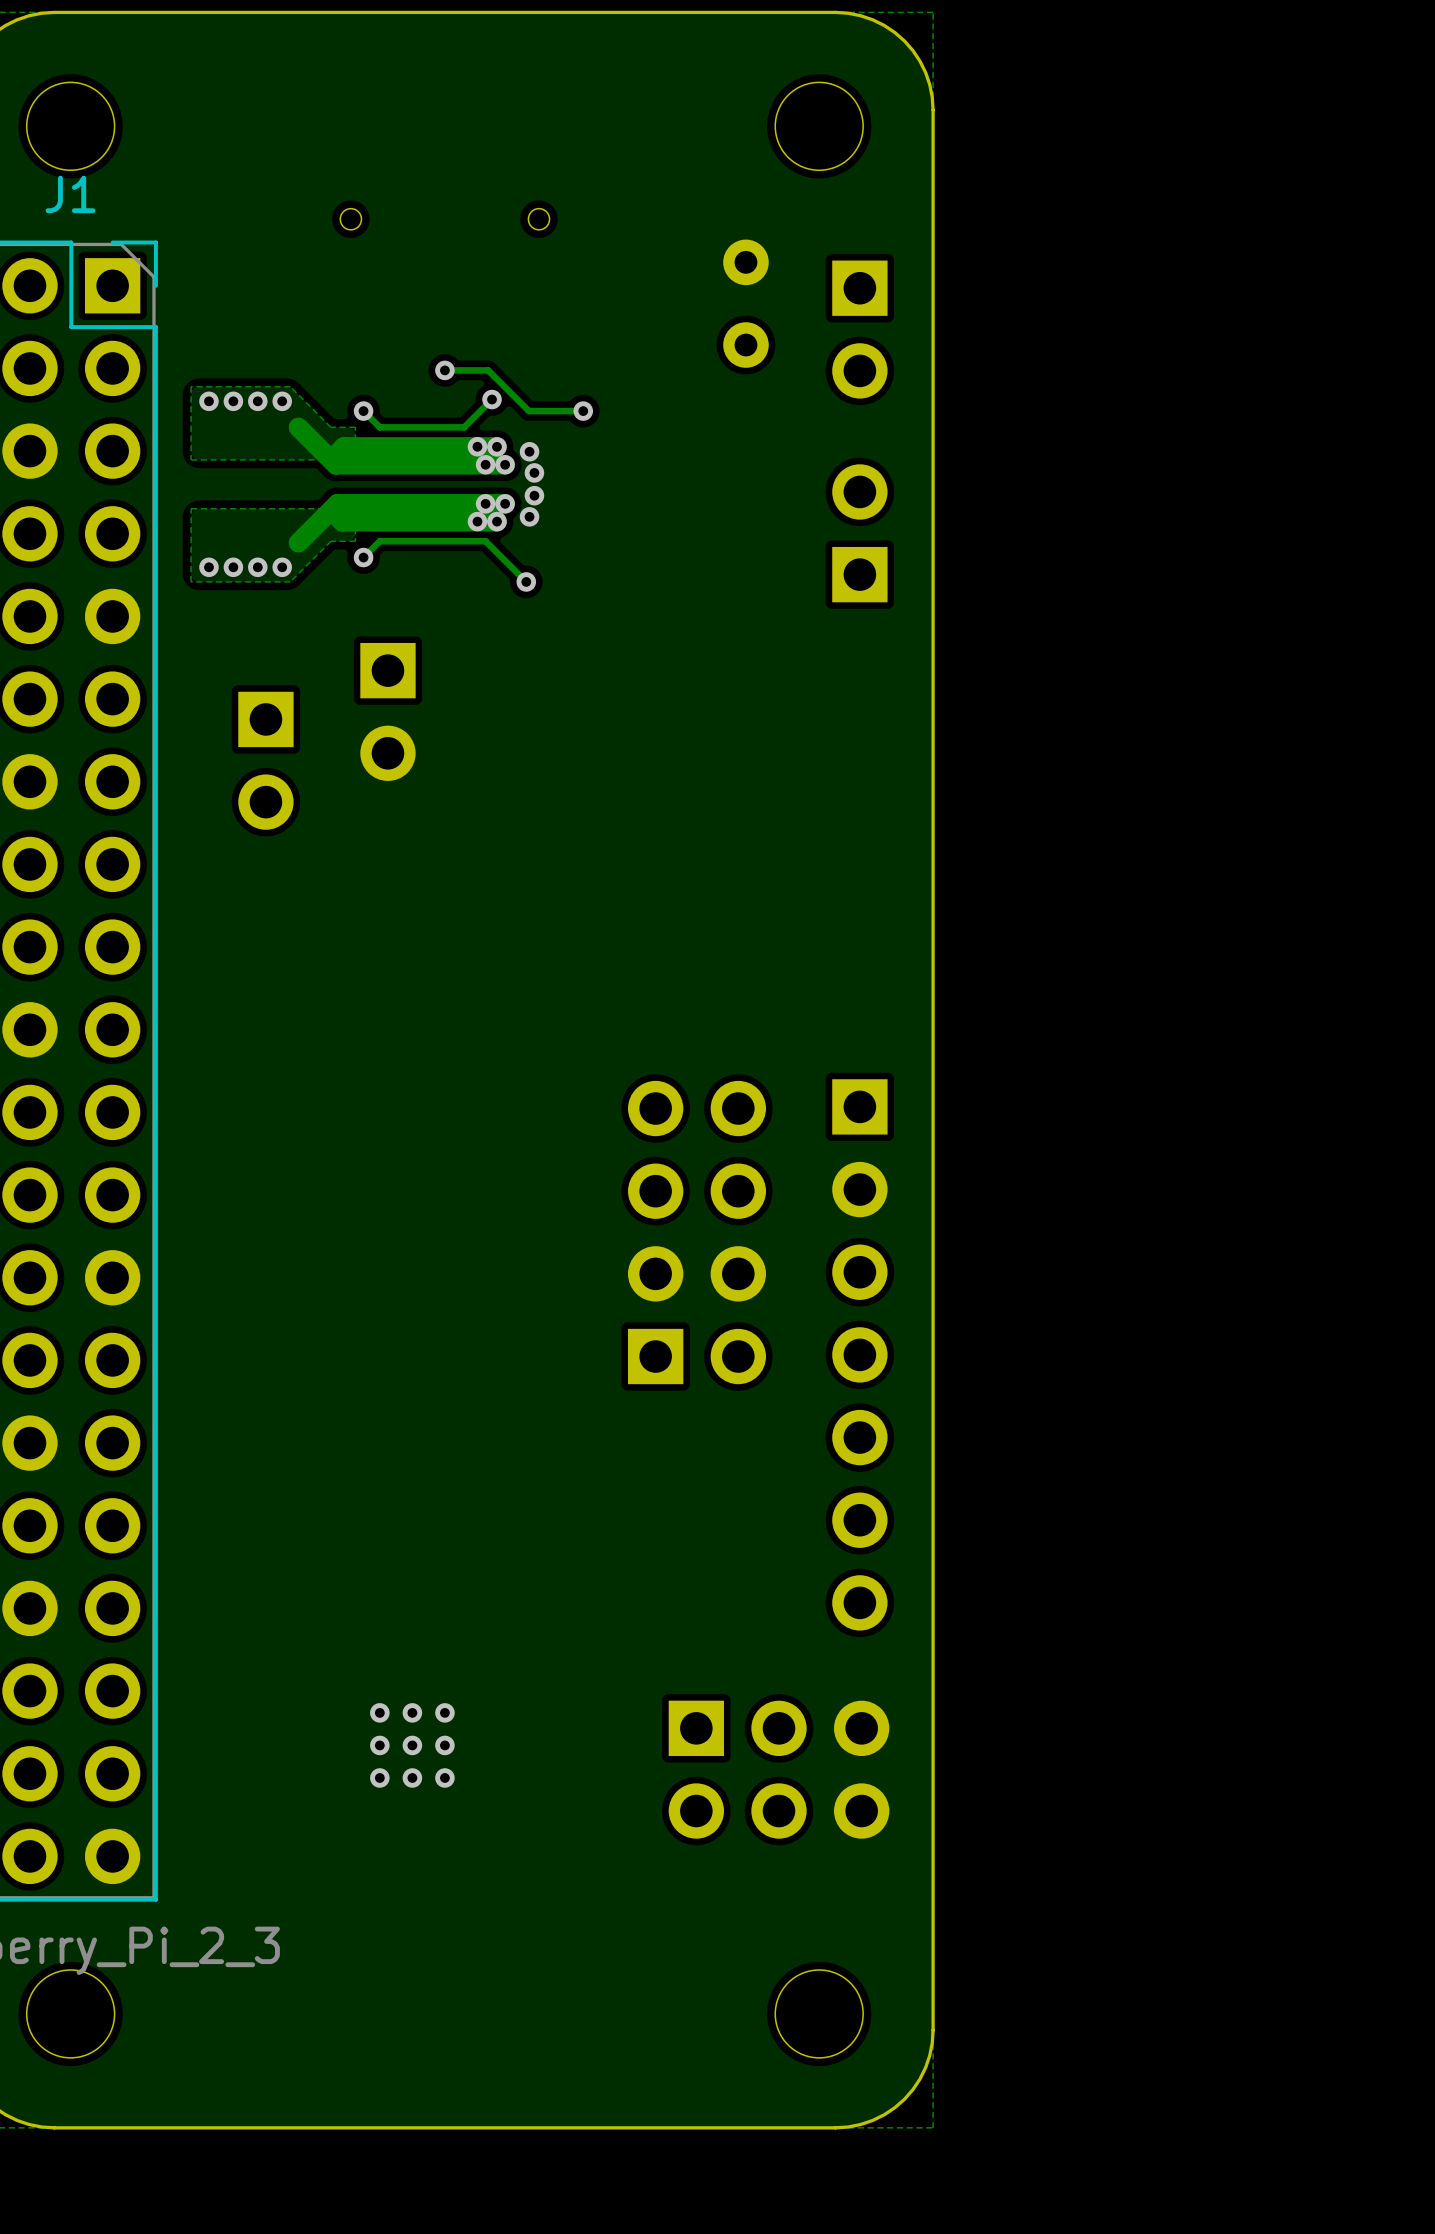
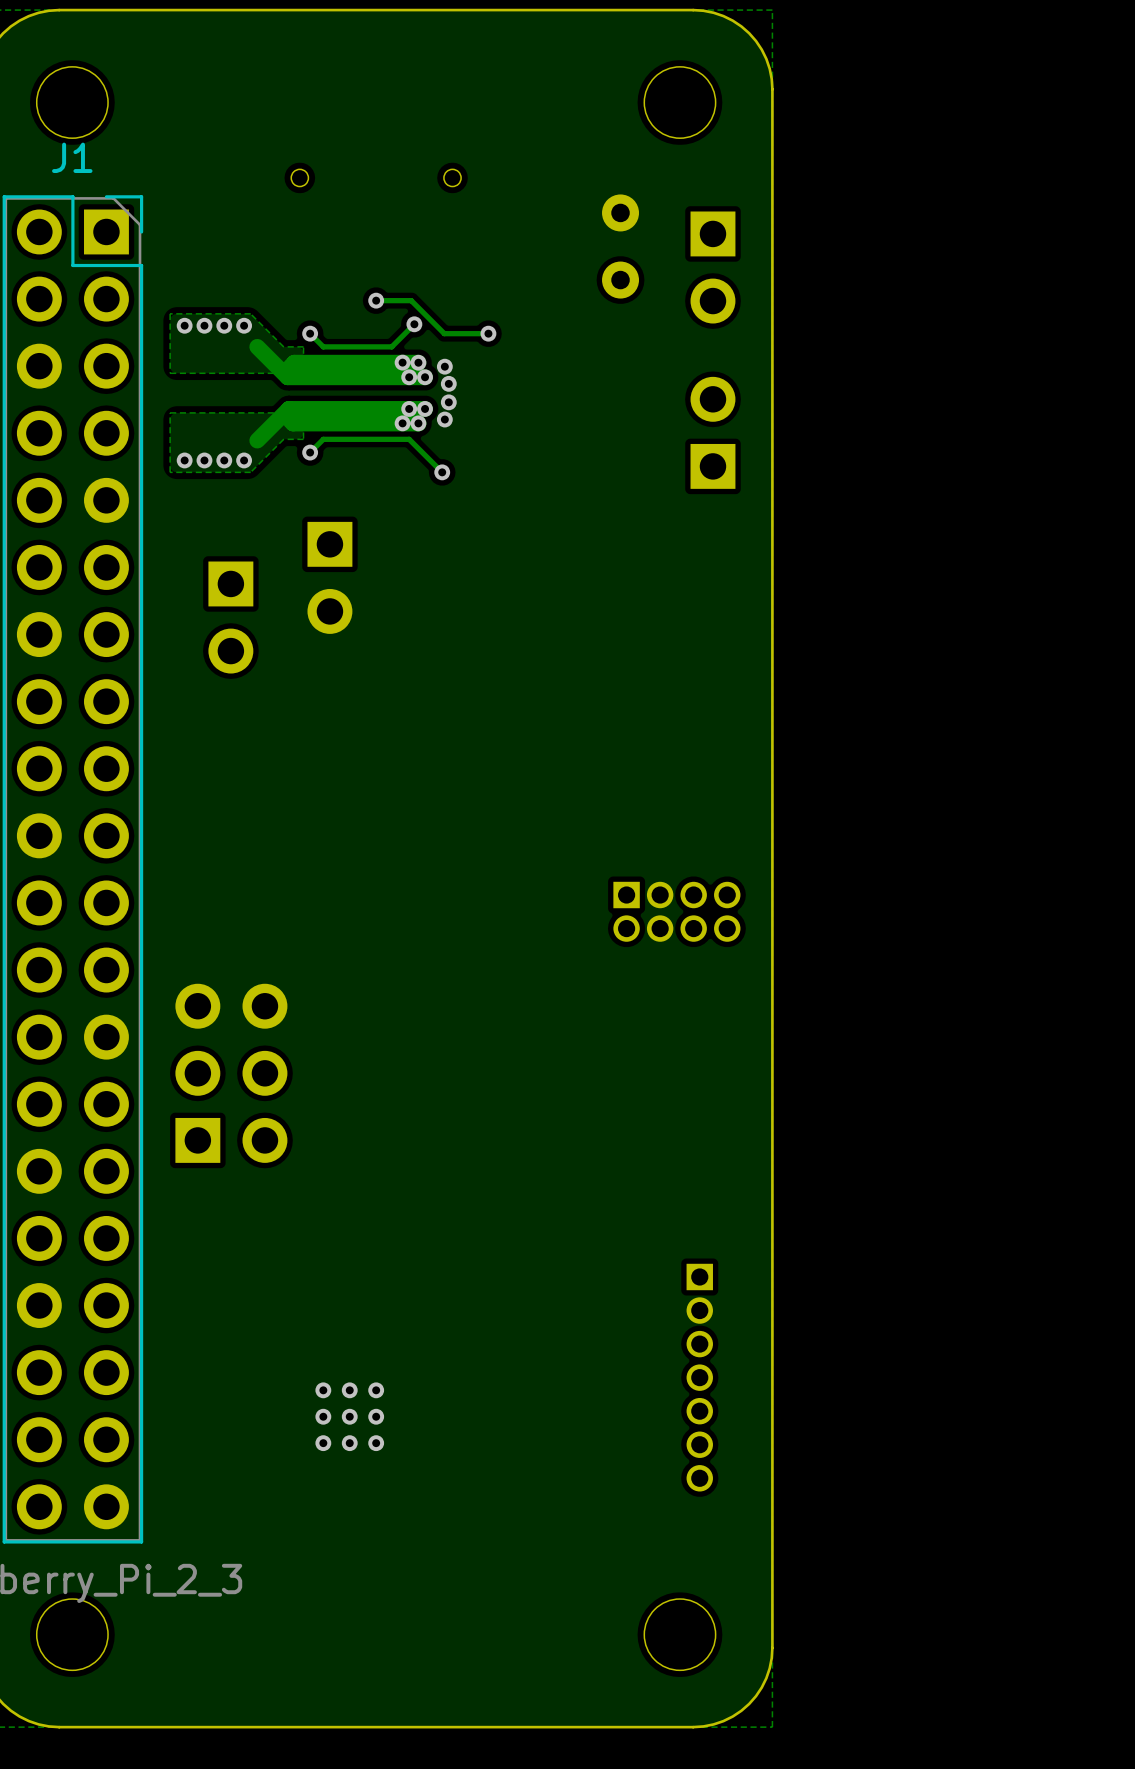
part: none -> (676, 911)
part: (696, 1232) -> none
part: (859, 1354) -> none
part: none -> (699, 1377)
part rotation: 0° (779, 1769) -> 90° counterclockwise (231, 1073)
part position: (779, 1769) -> (231, 1073)

